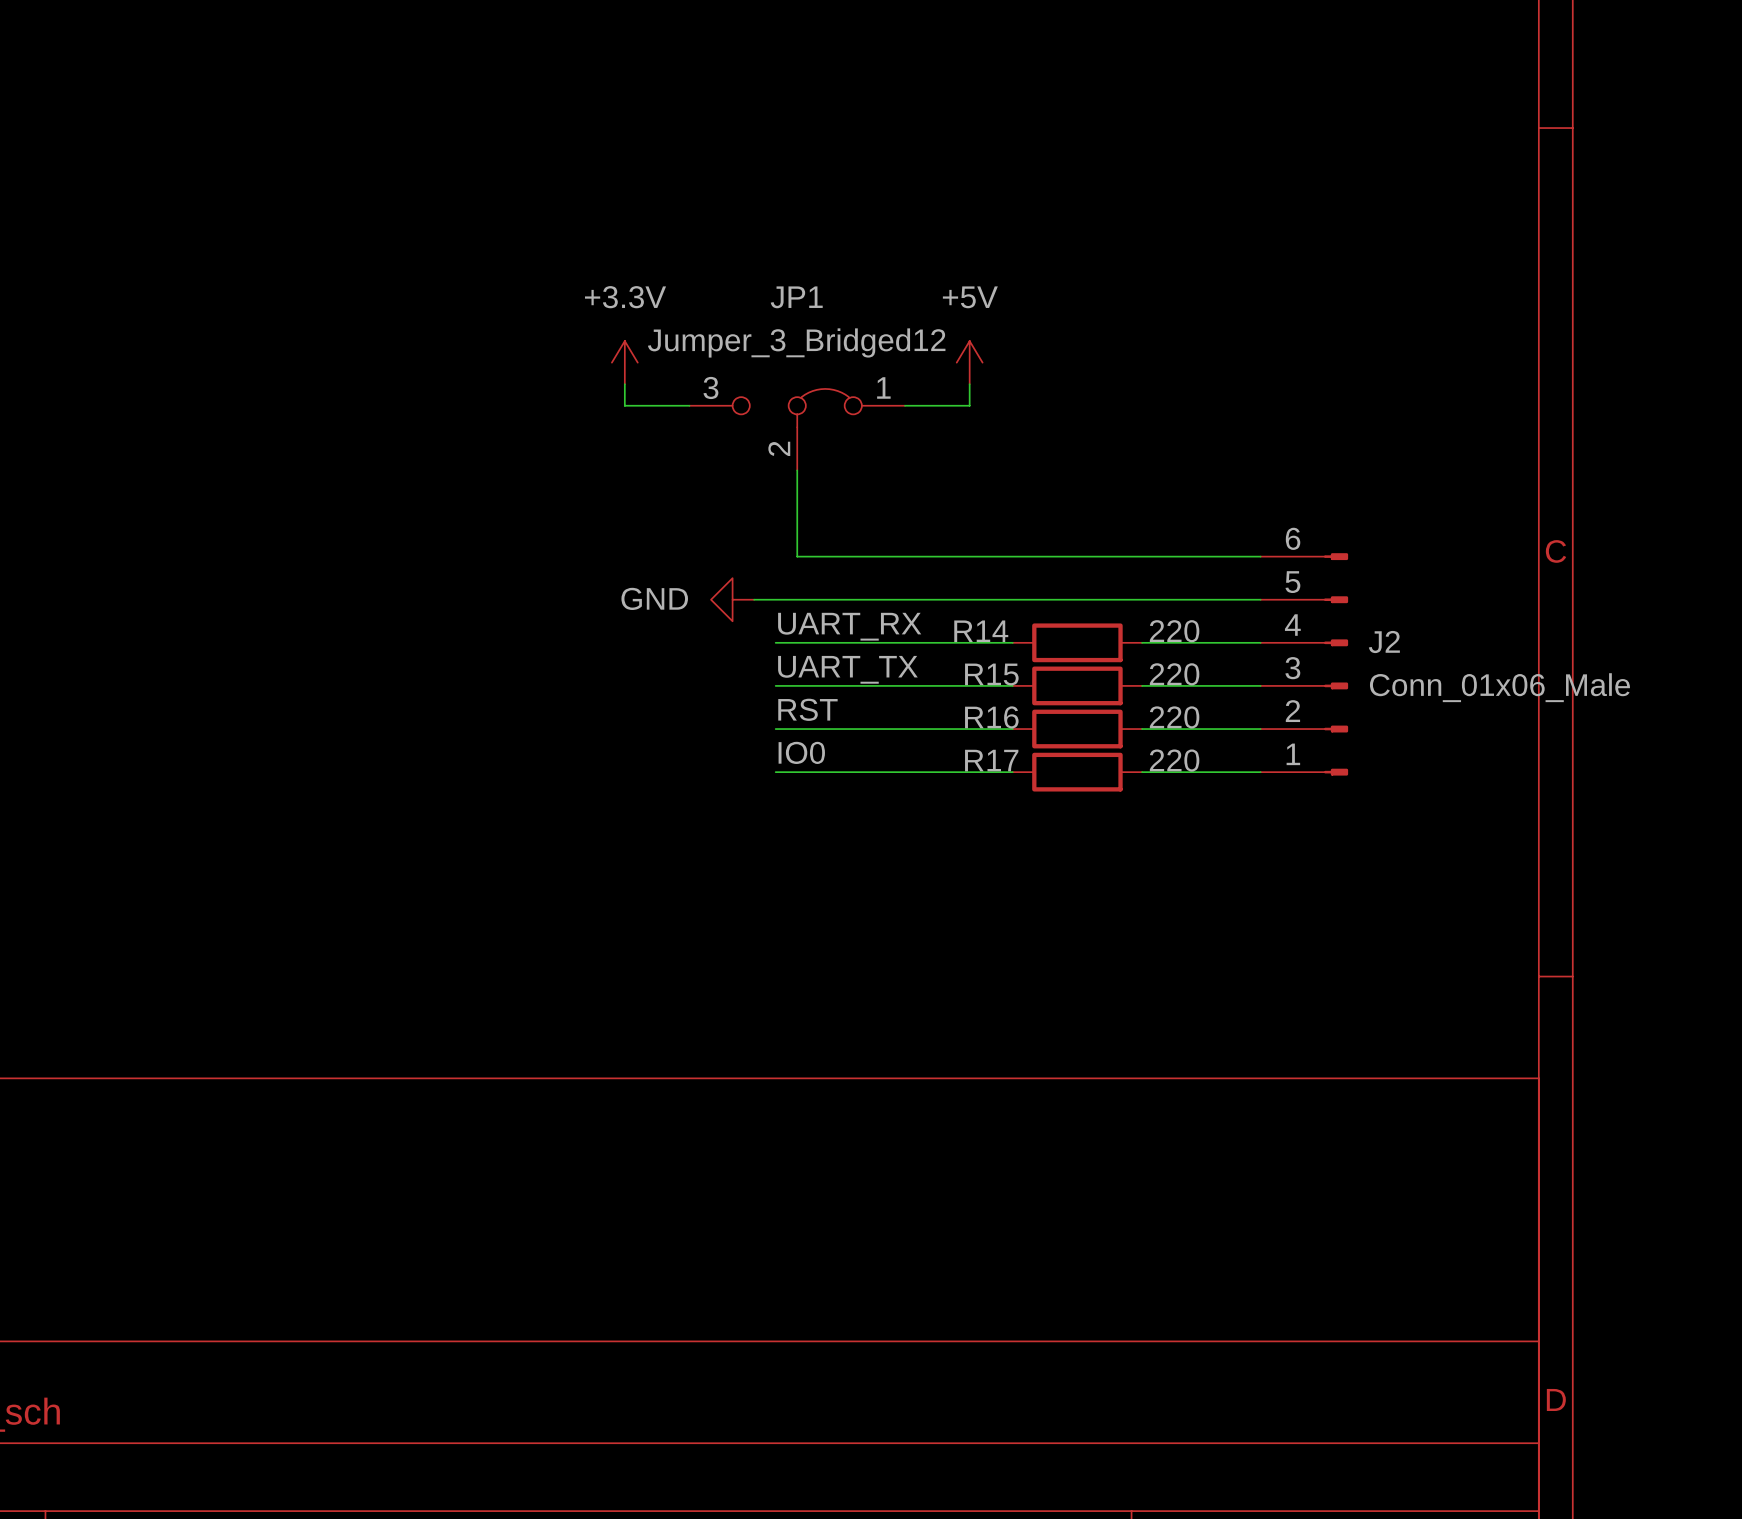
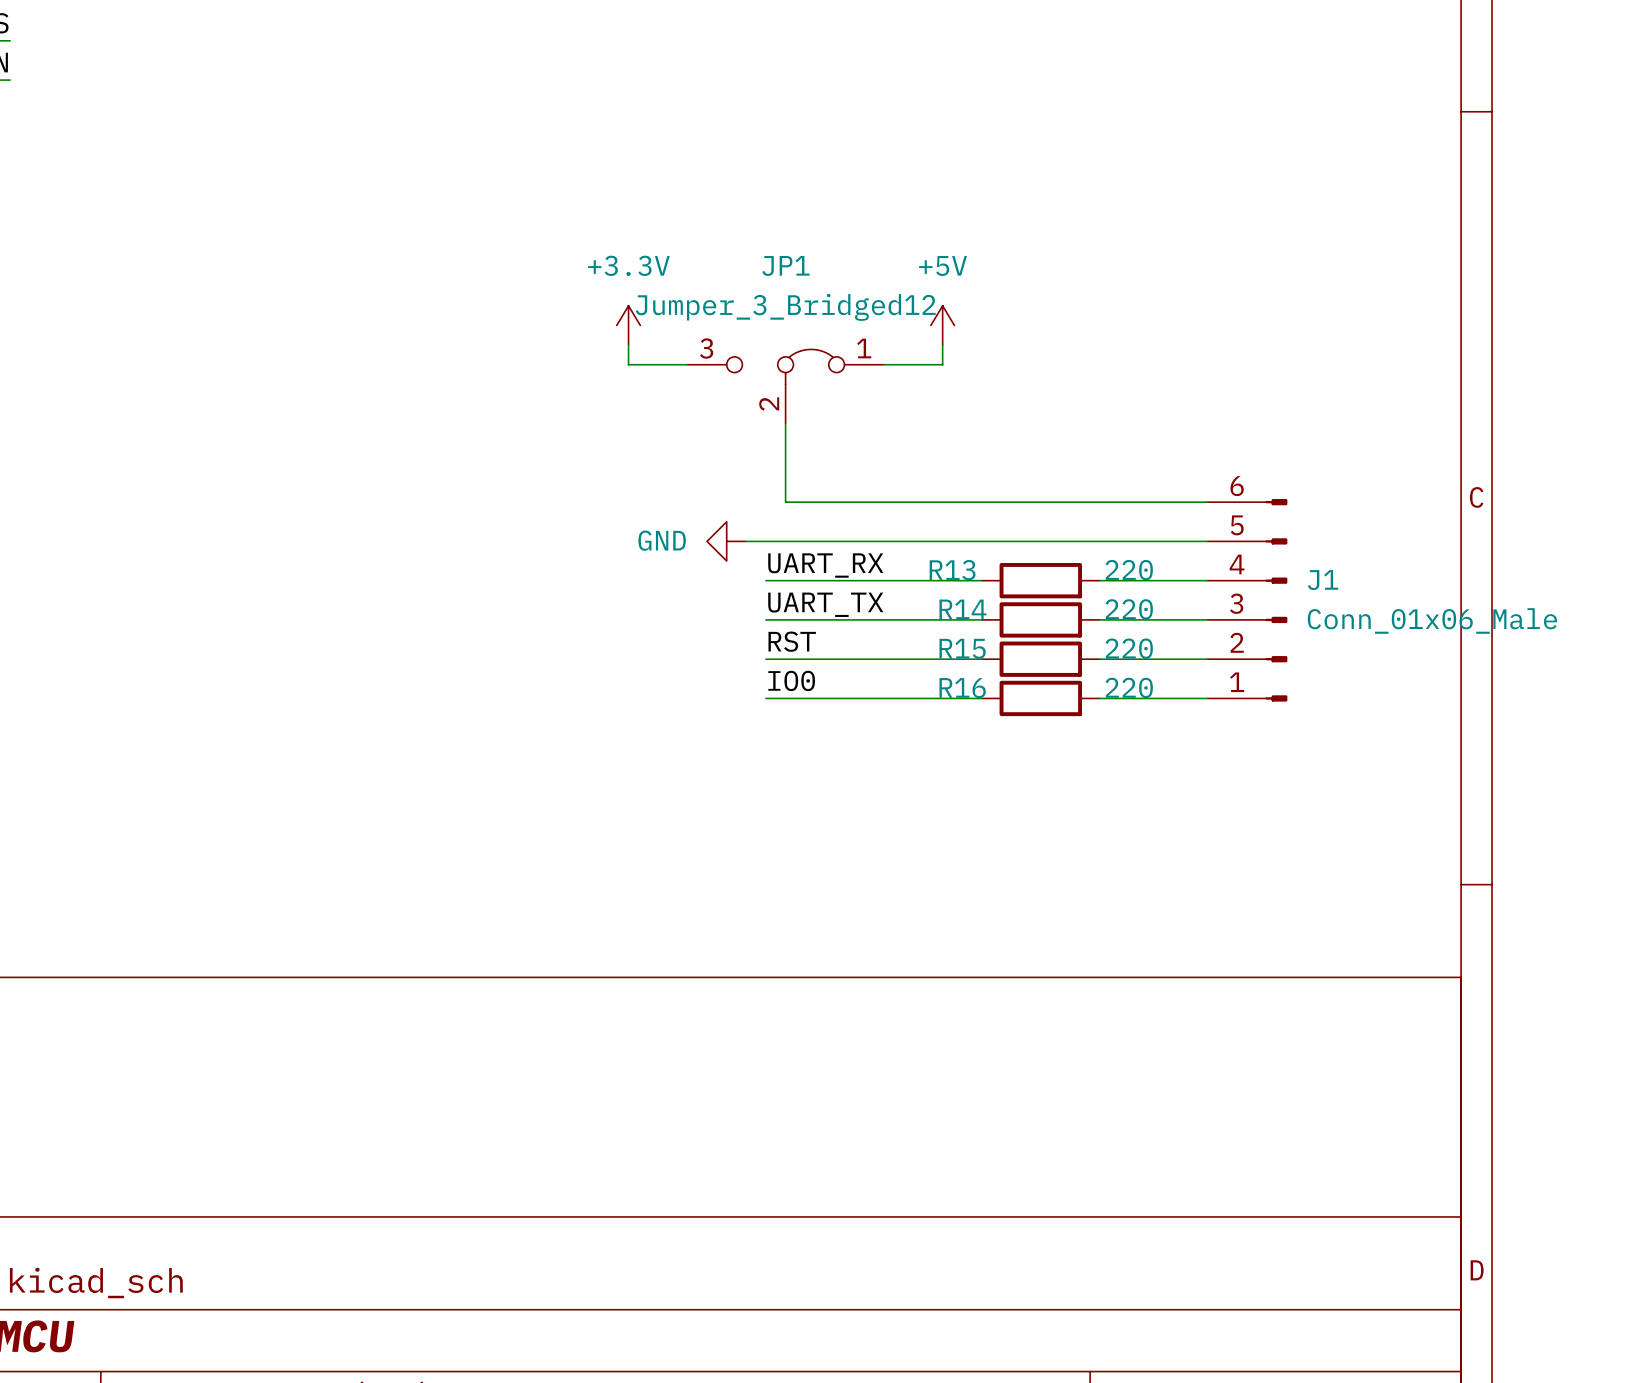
R14 name: R14 (981, 631) -> R13 (952, 570)
J2 name: J2 (1384, 642) -> J1 (1323, 580)
R15 name: R15 (991, 674) -> R14 (963, 609)
R16 name: R16 (991, 717) -> R15 (962, 648)
R17 name: R17 (991, 760) -> R16 (962, 688)

